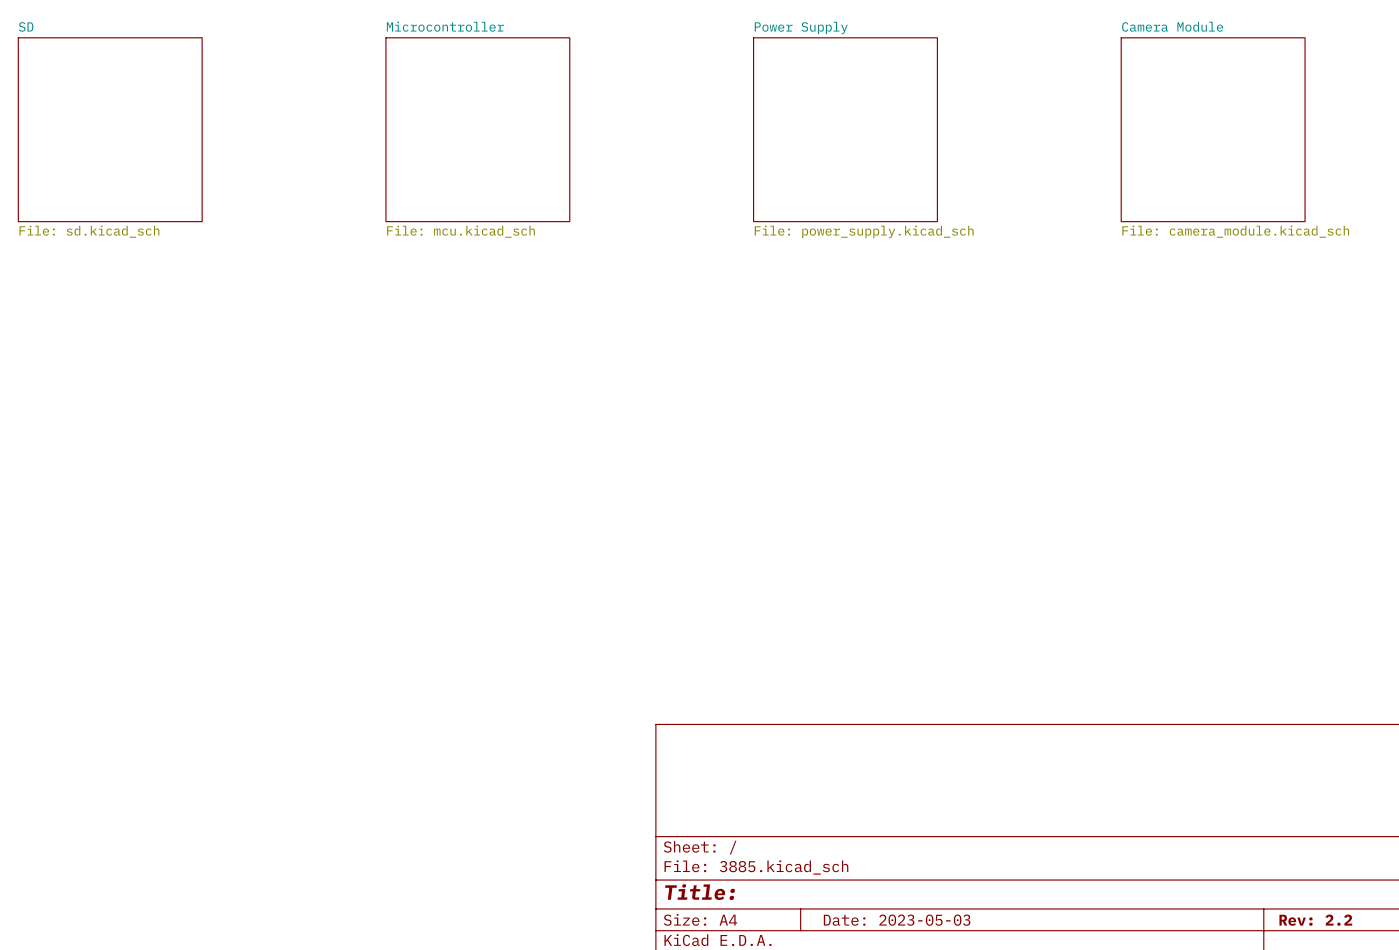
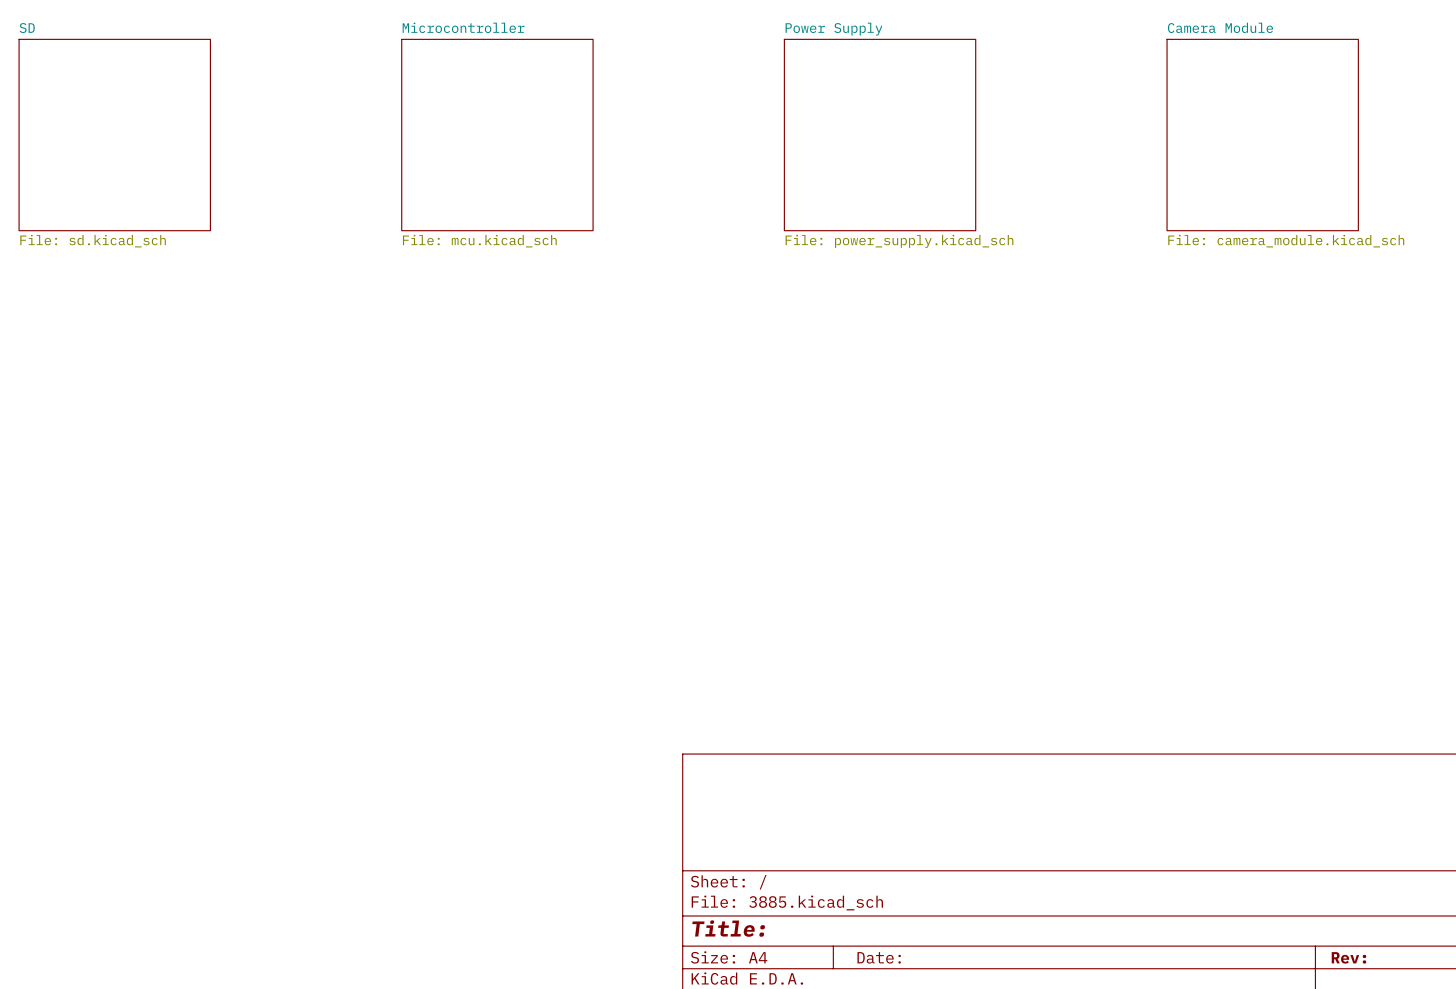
title block: Date: 2023-05-03 (897, 920) -> Date: (879, 957)
title block: Rev: 2.2 (1315, 920) -> Rev: (1348, 957)

